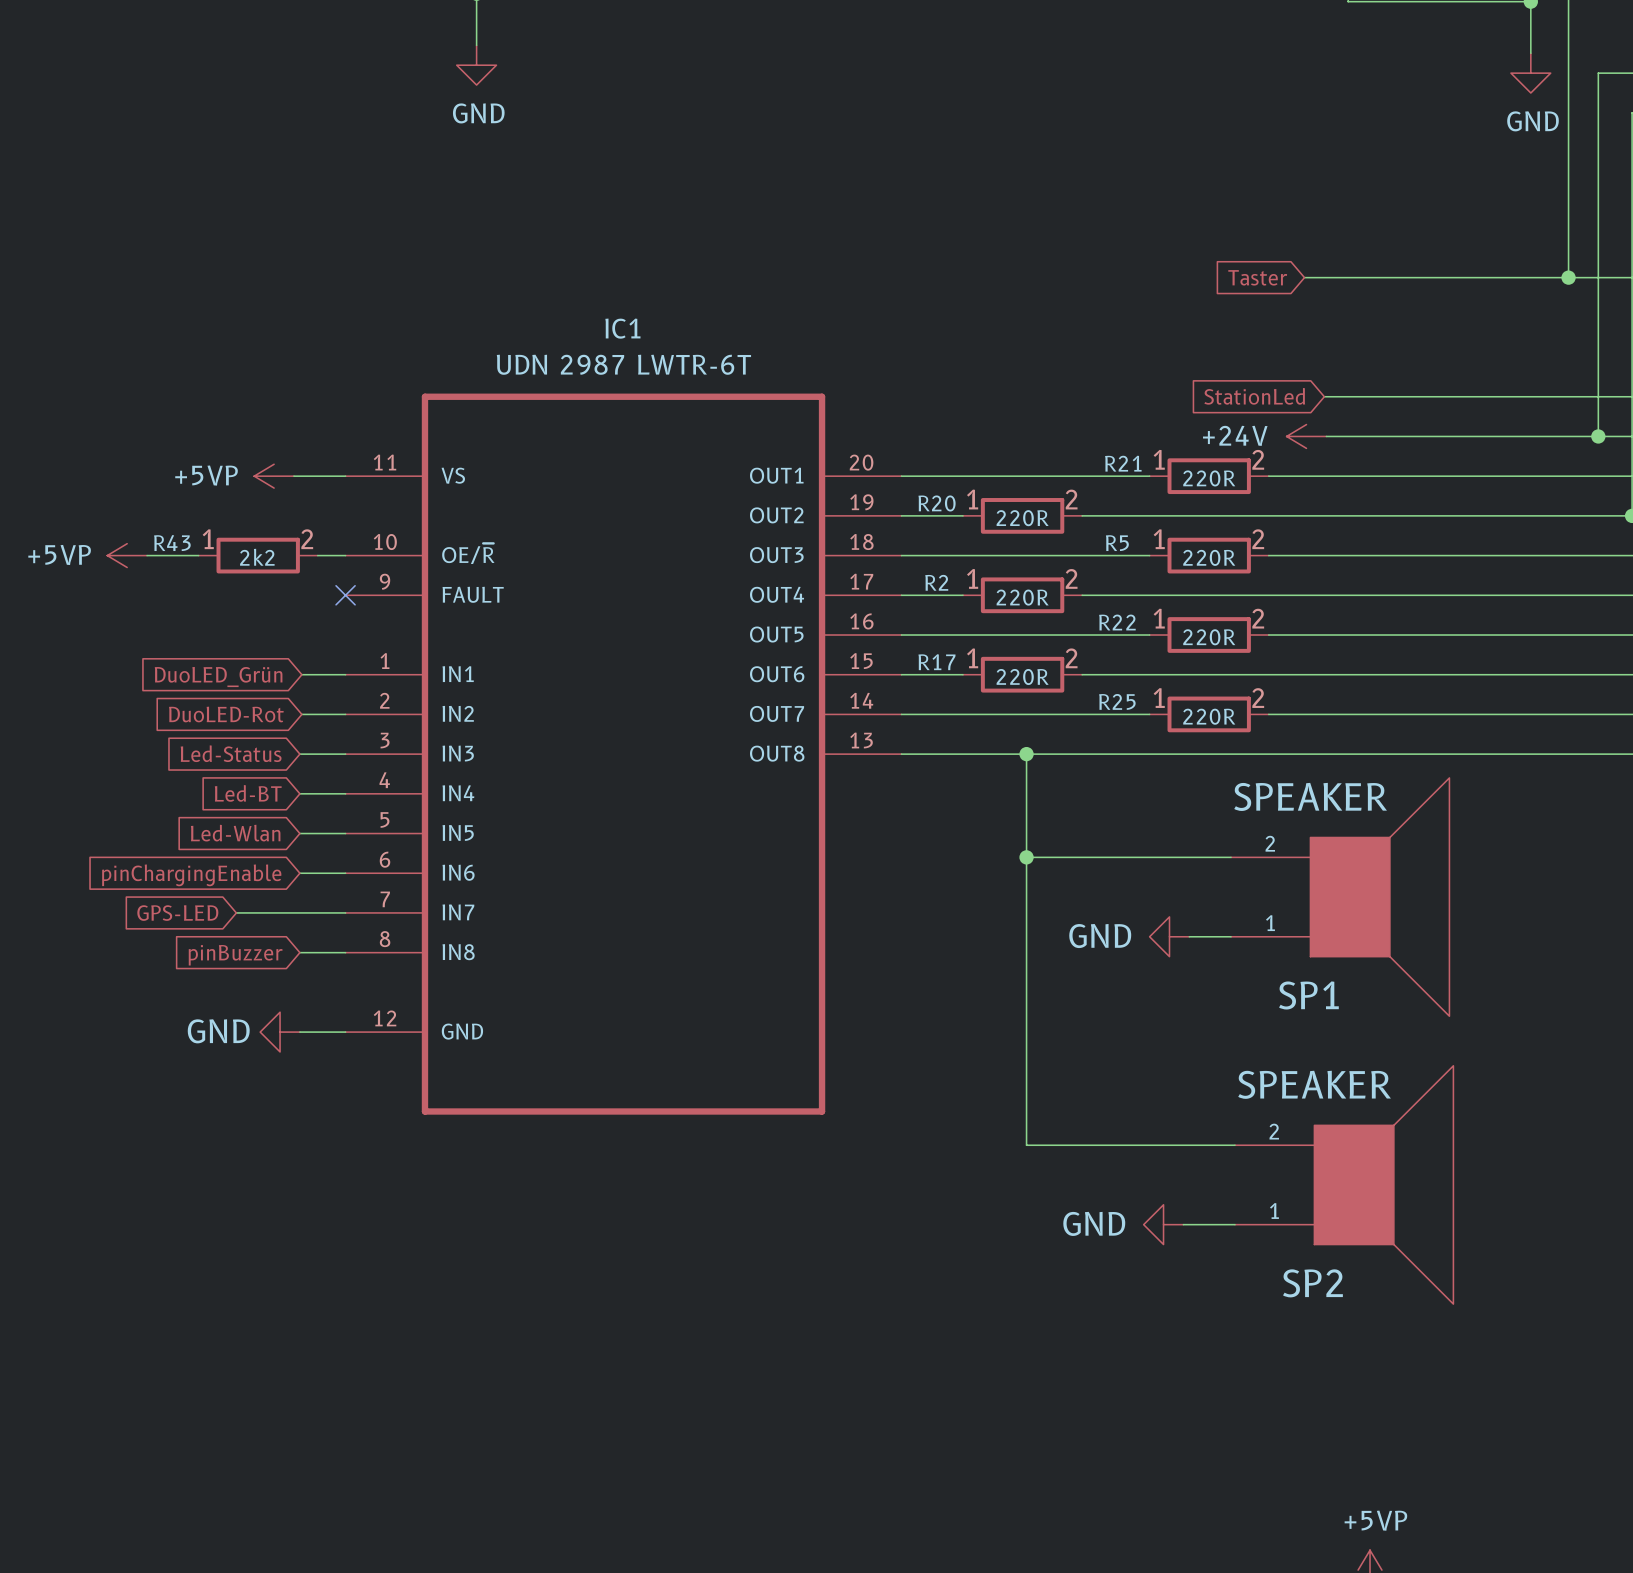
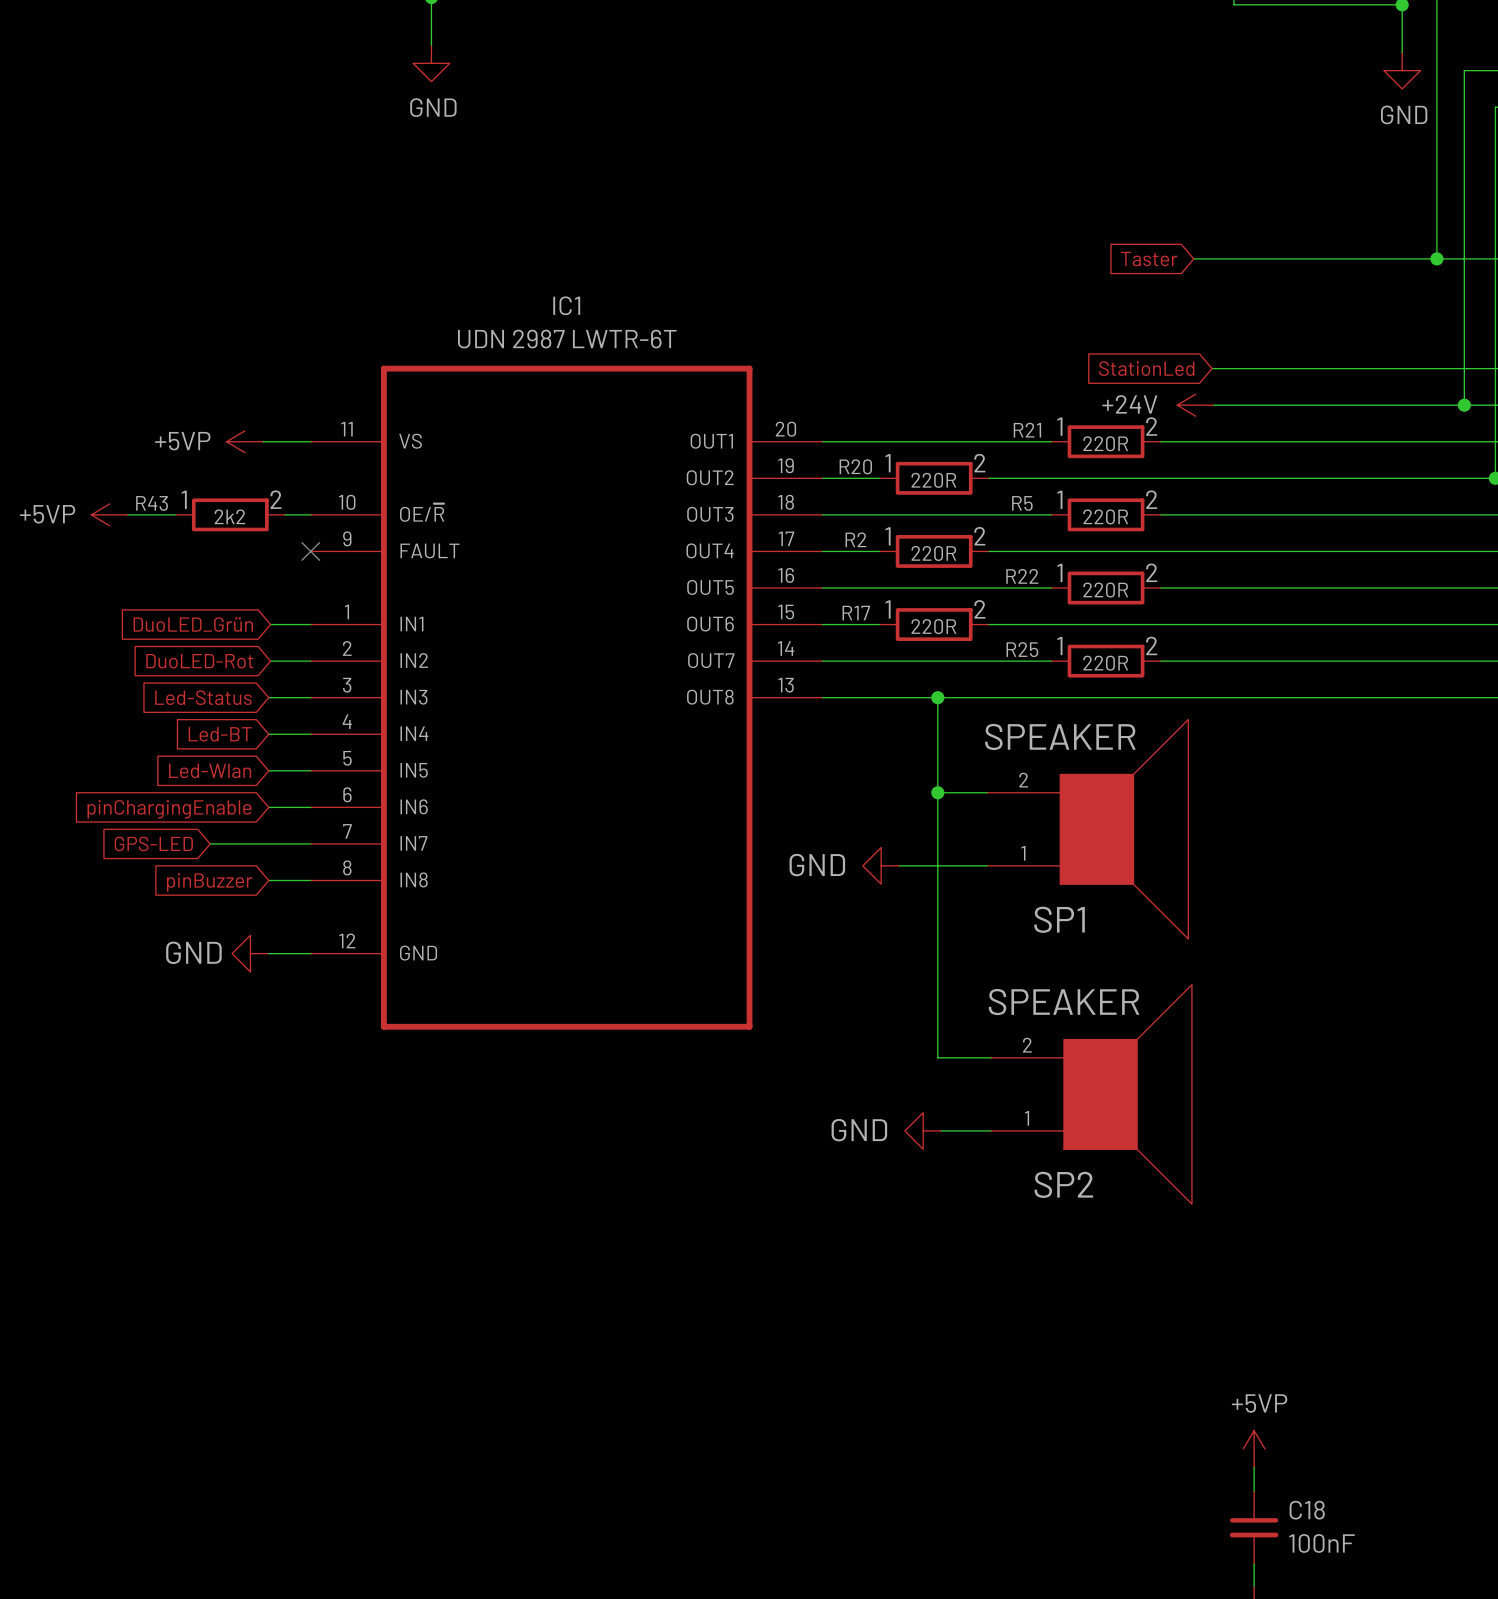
SP1 position: (1340, 897) -> (1087, 829)
power symbol: none -> GND (881, 865)
wire: none -> (899, 865) (987, 865)
power symbol: GND (1169, 936) -> none
SP2 position: (1344, 1184) -> (1091, 1094)
wire: none -> (941, 1130) (990, 1130)
power symbol position: GND (1163, 1224) -> GND (923, 1130)

